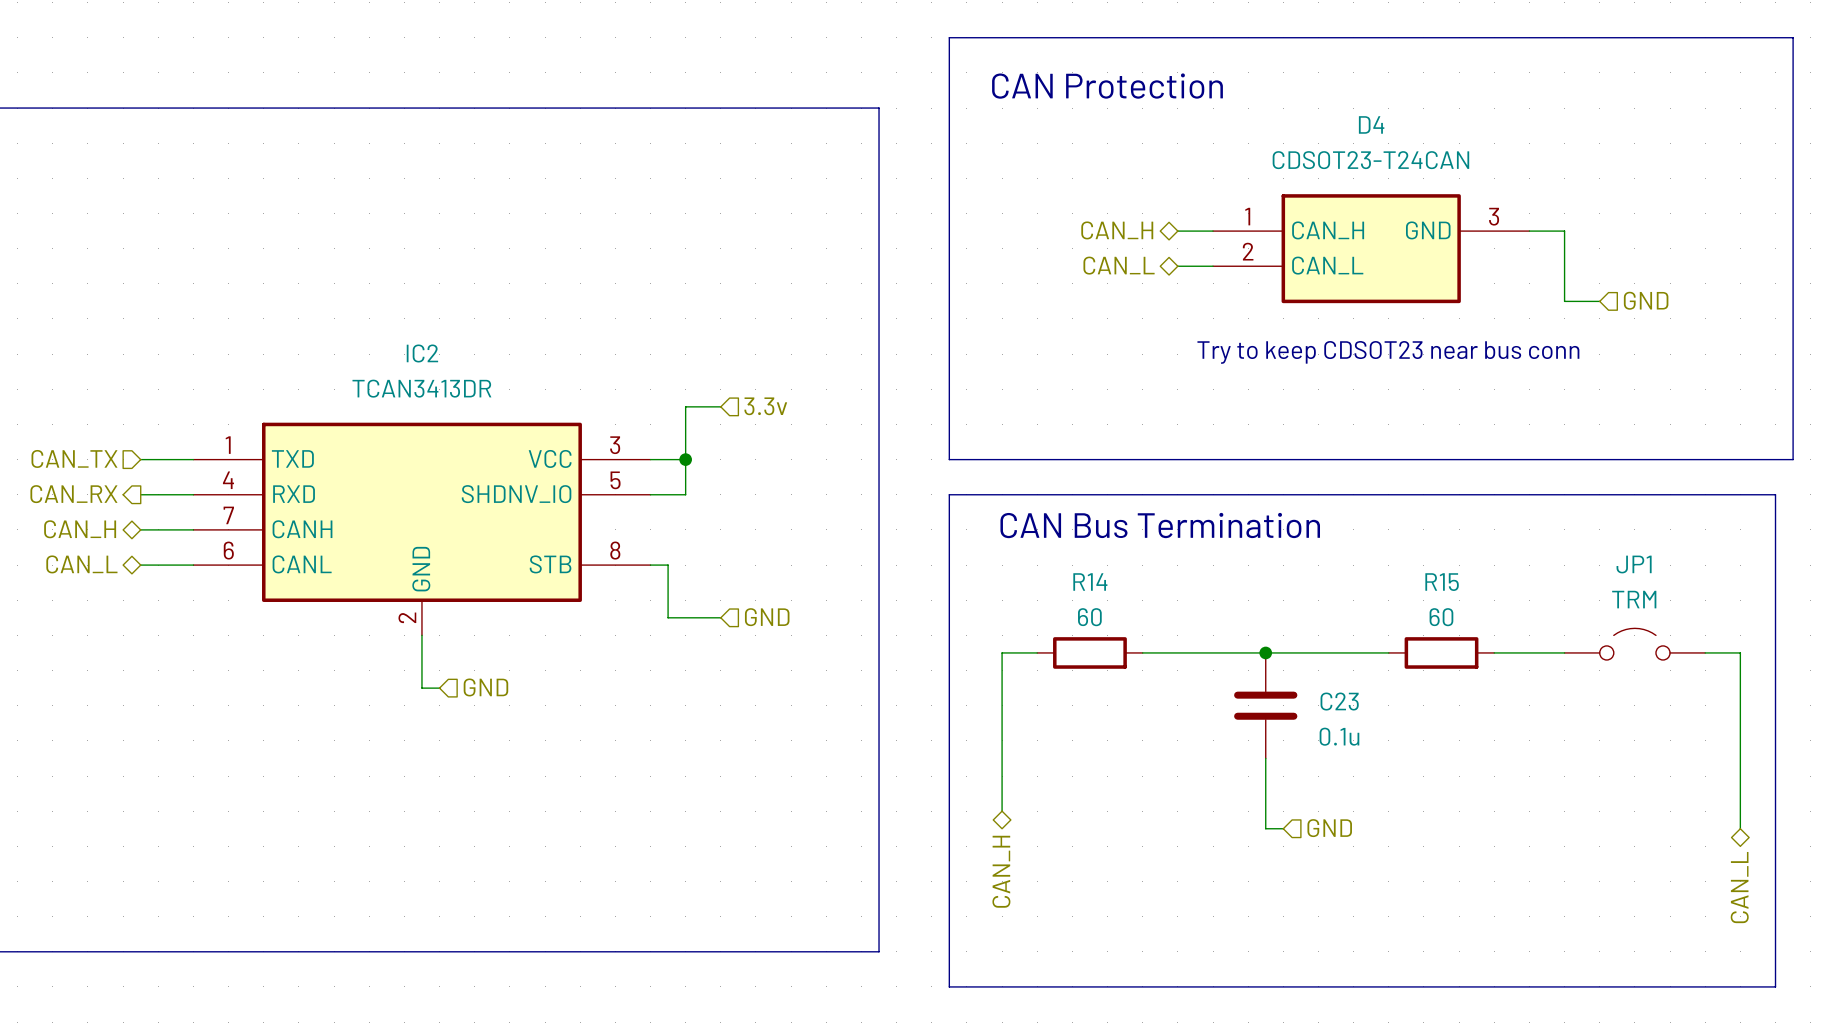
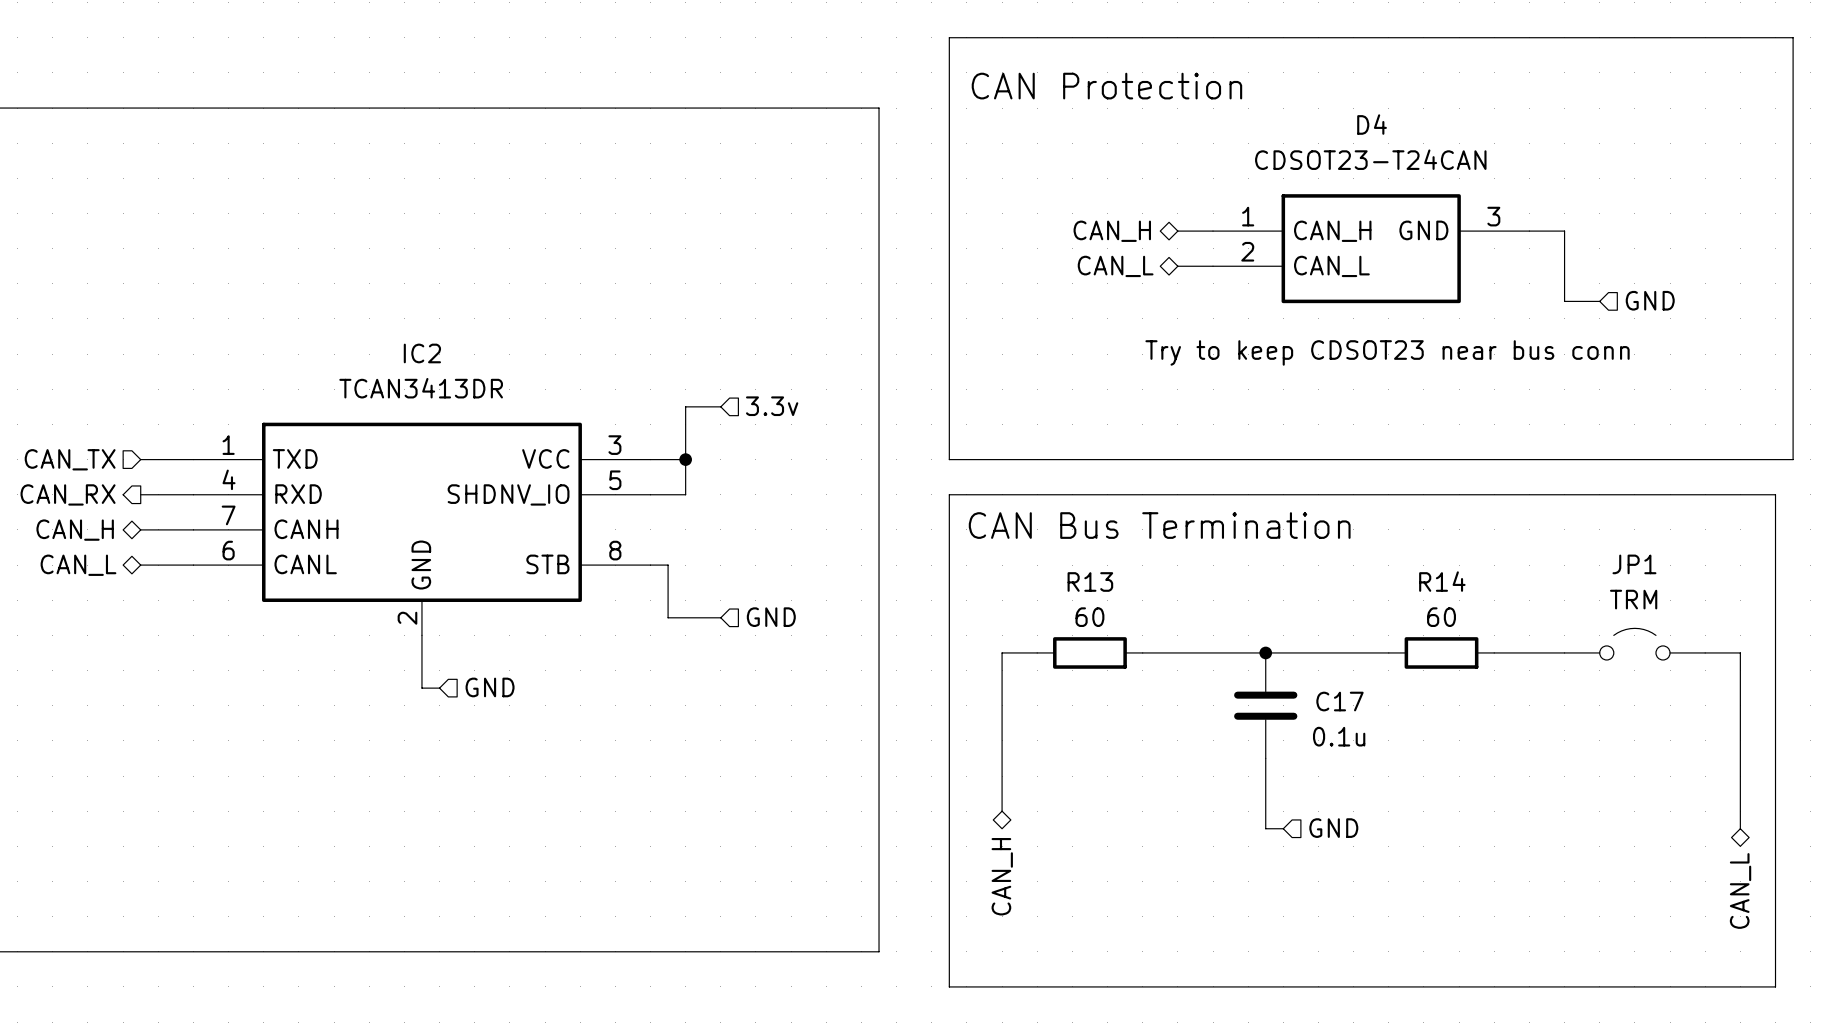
R14 name: R14 (1090, 581) -> R13 (1090, 581)
R15 name: R15 (1442, 582) -> R14 (1442, 581)
C23 name: C23 (1339, 701) -> C17 (1339, 701)

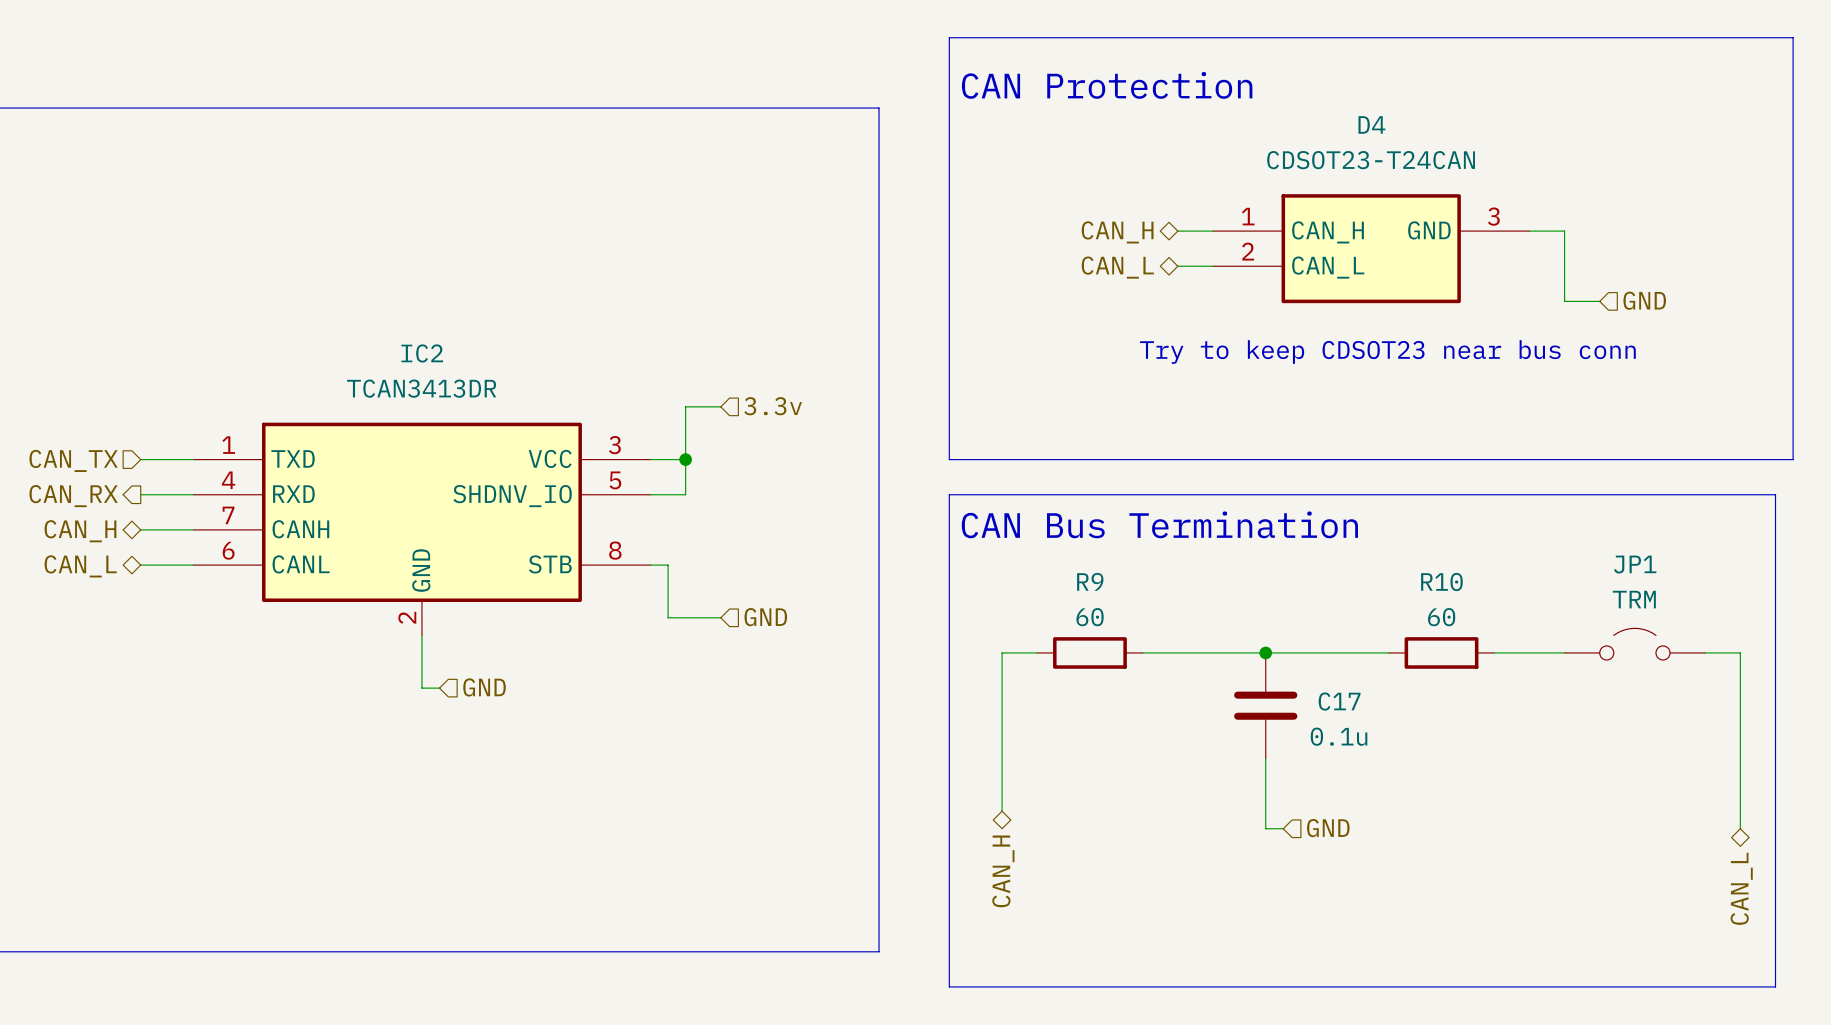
R13 name: R13 (1090, 581) -> R9 (1090, 581)
R14 name: R14 (1442, 581) -> R10 (1441, 581)

